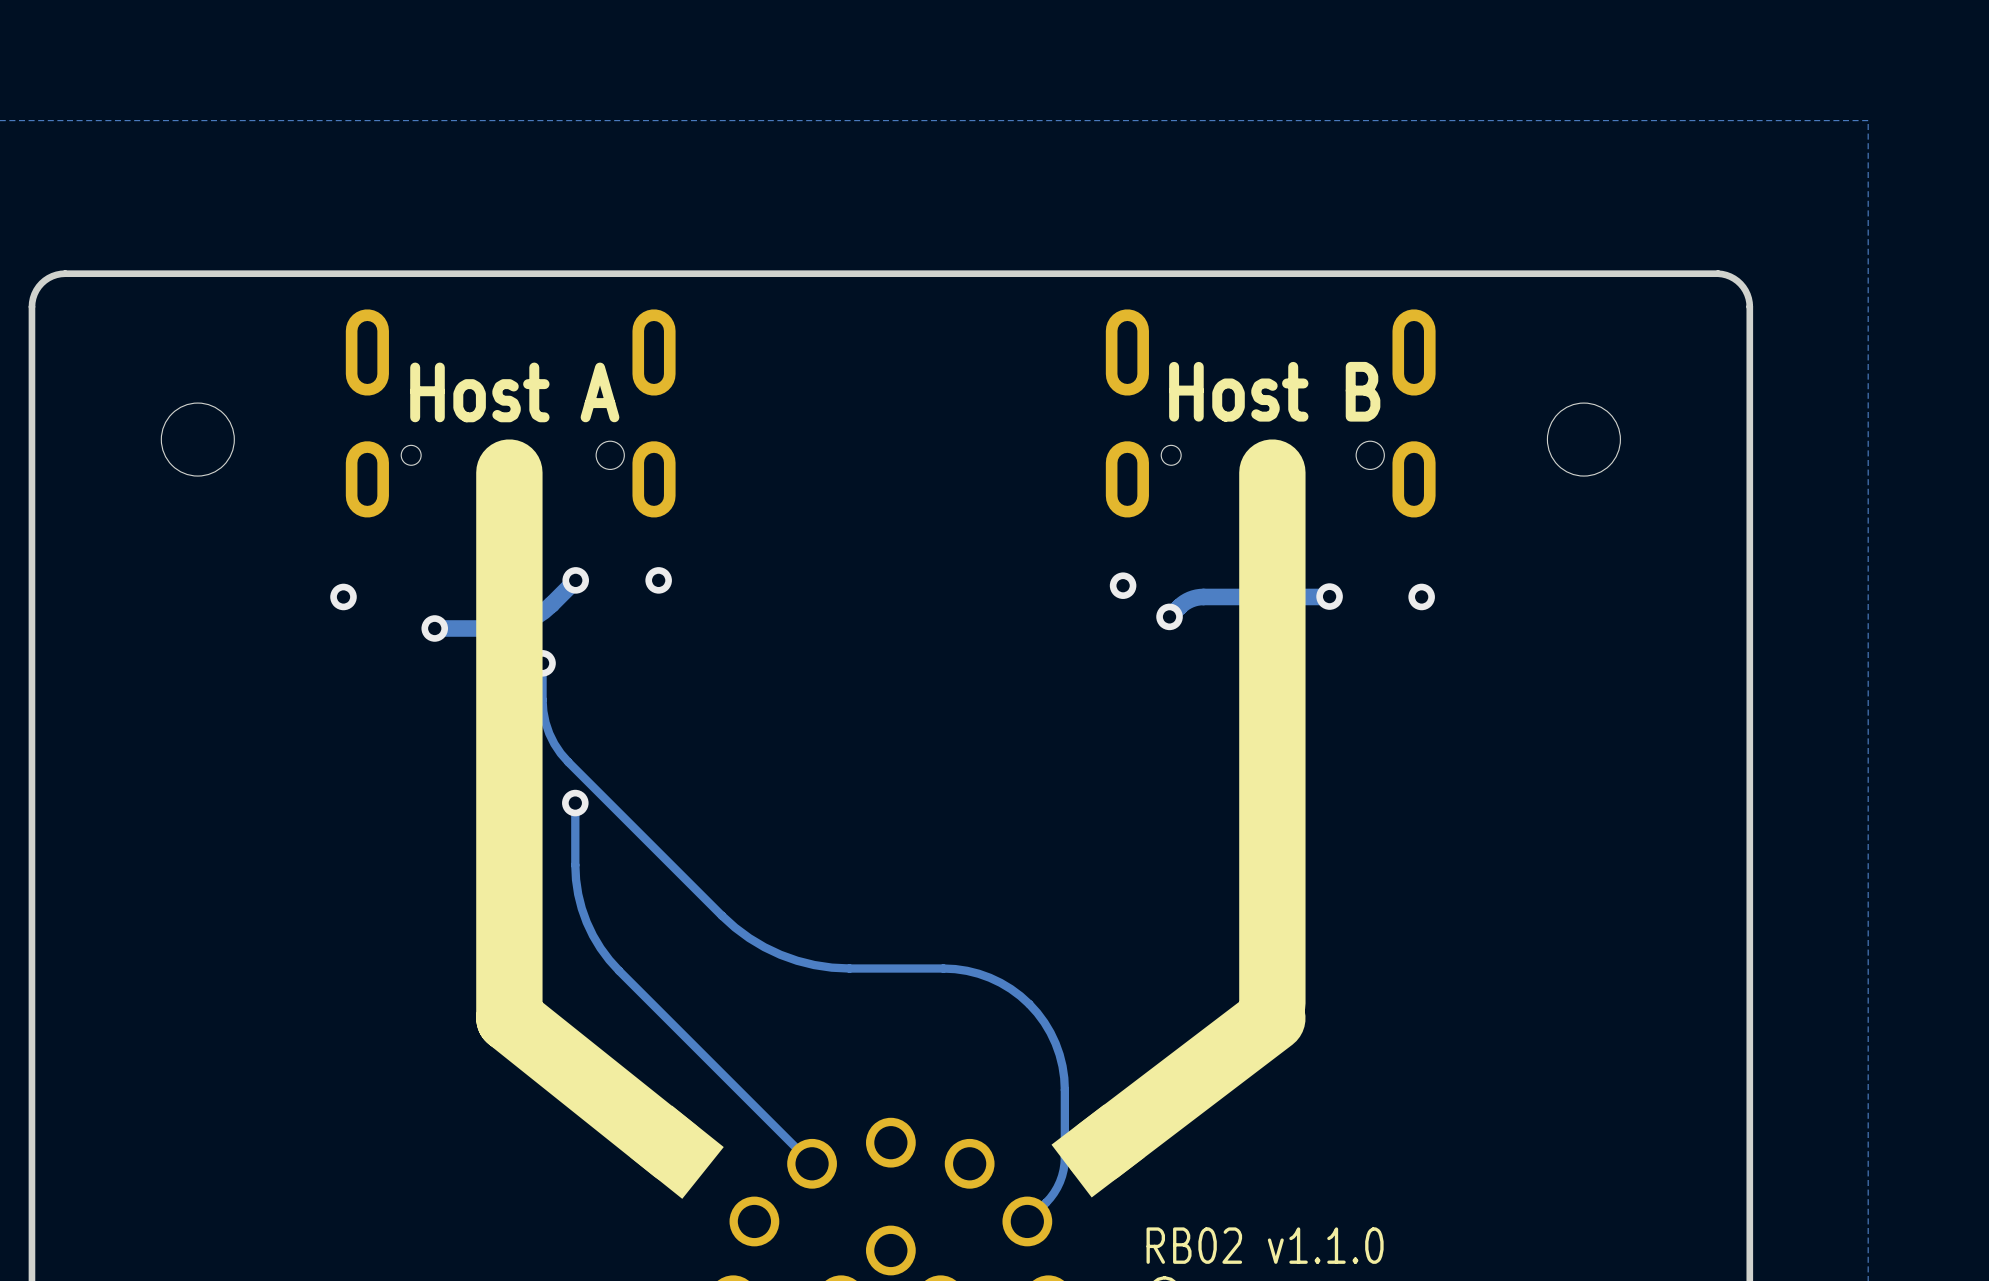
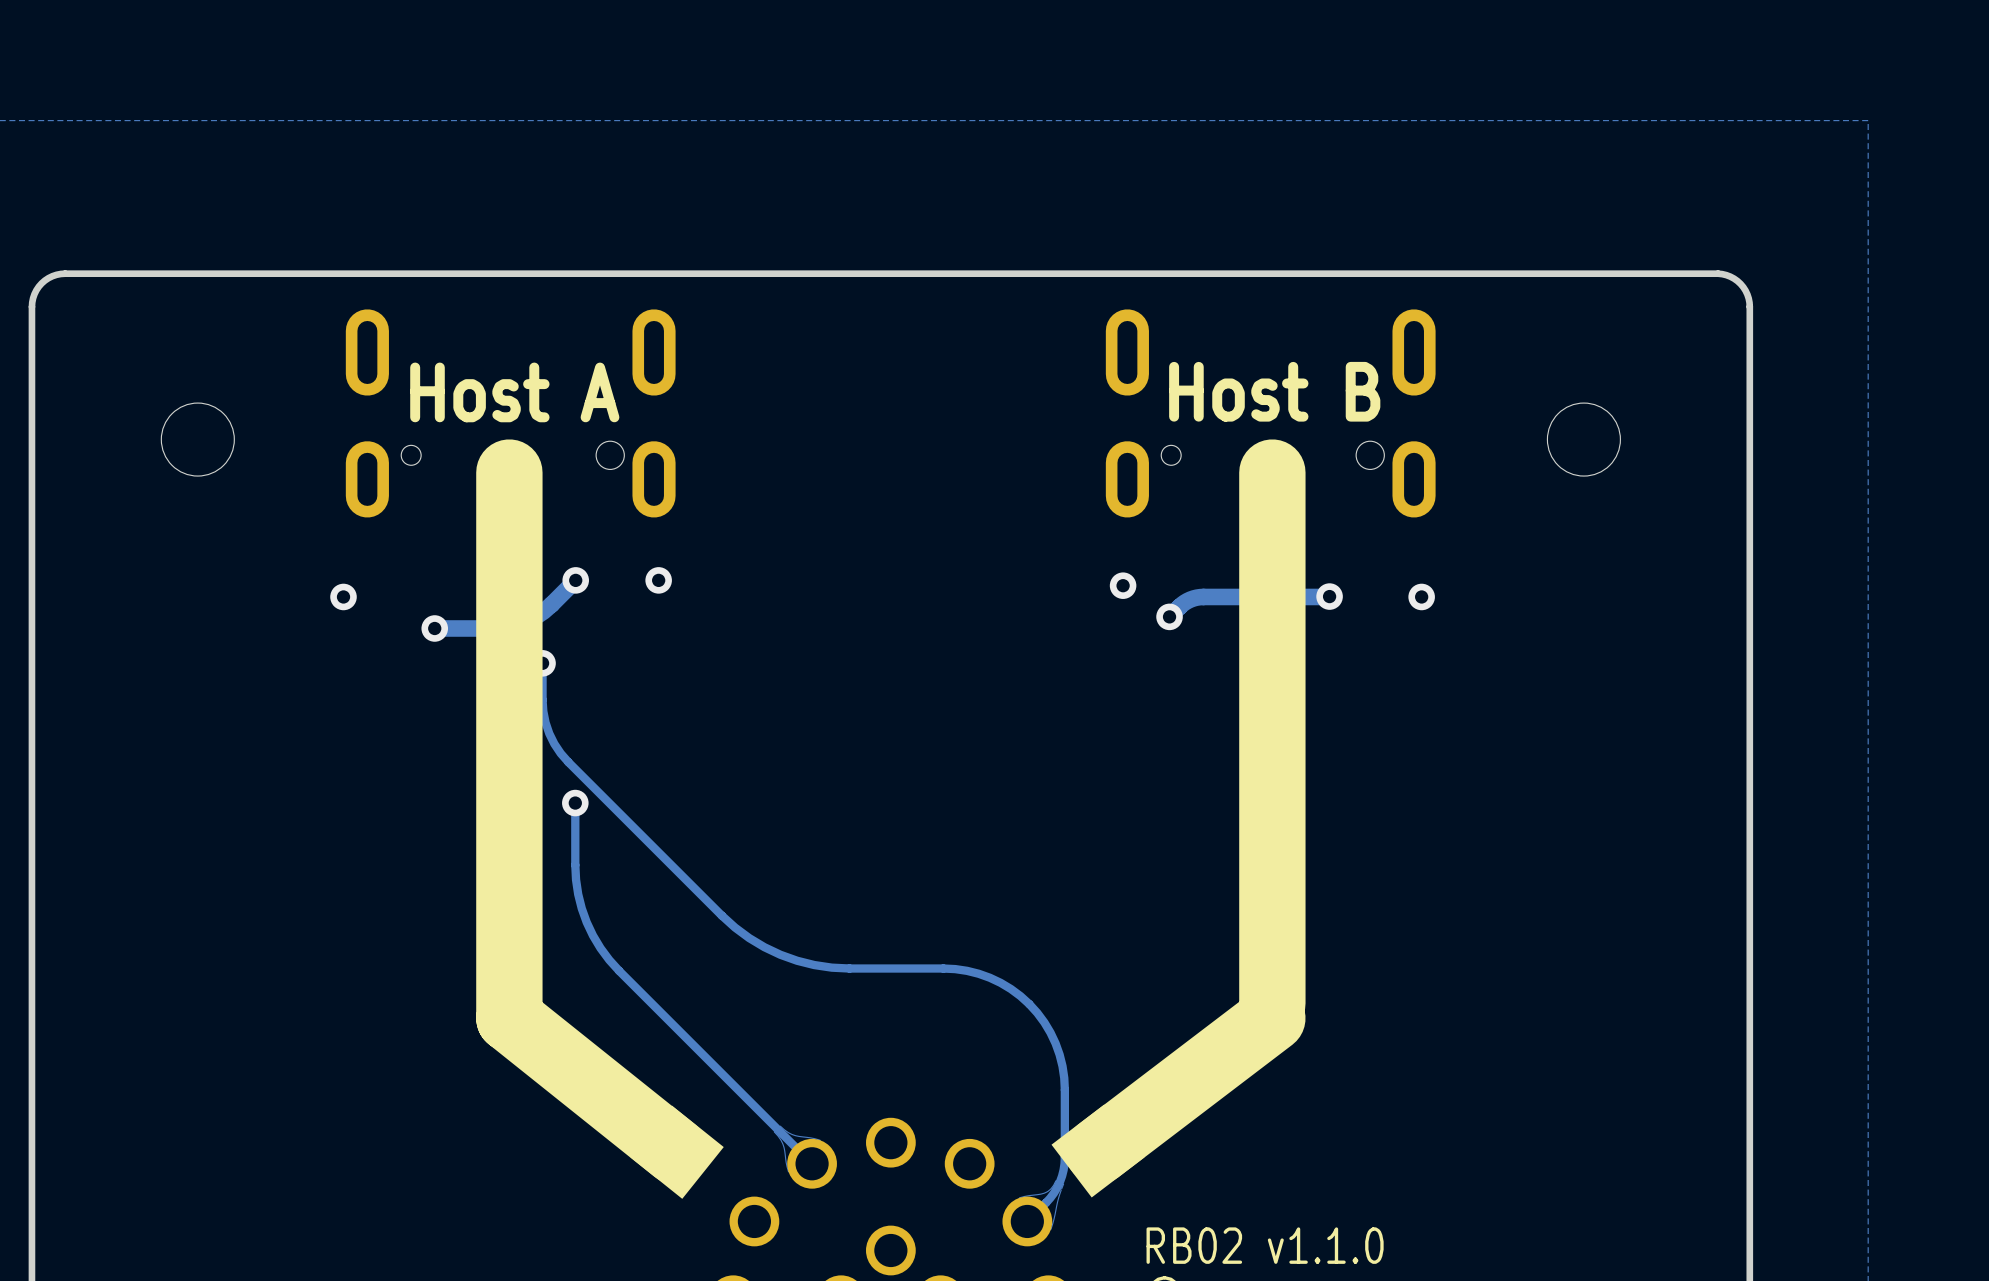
zone outline: none -> (780, 1125) (792, 1134) (820, 1140) (820, 1172) (788, 1171) (782, 1143) (774, 1131) (780, 1125)
zone outline: none -> (1056, 1180) (1050, 1189) (1044, 1193) (1019, 1197) (1018, 1230) (1050, 1229) (1063, 1183) (1056, 1180)

